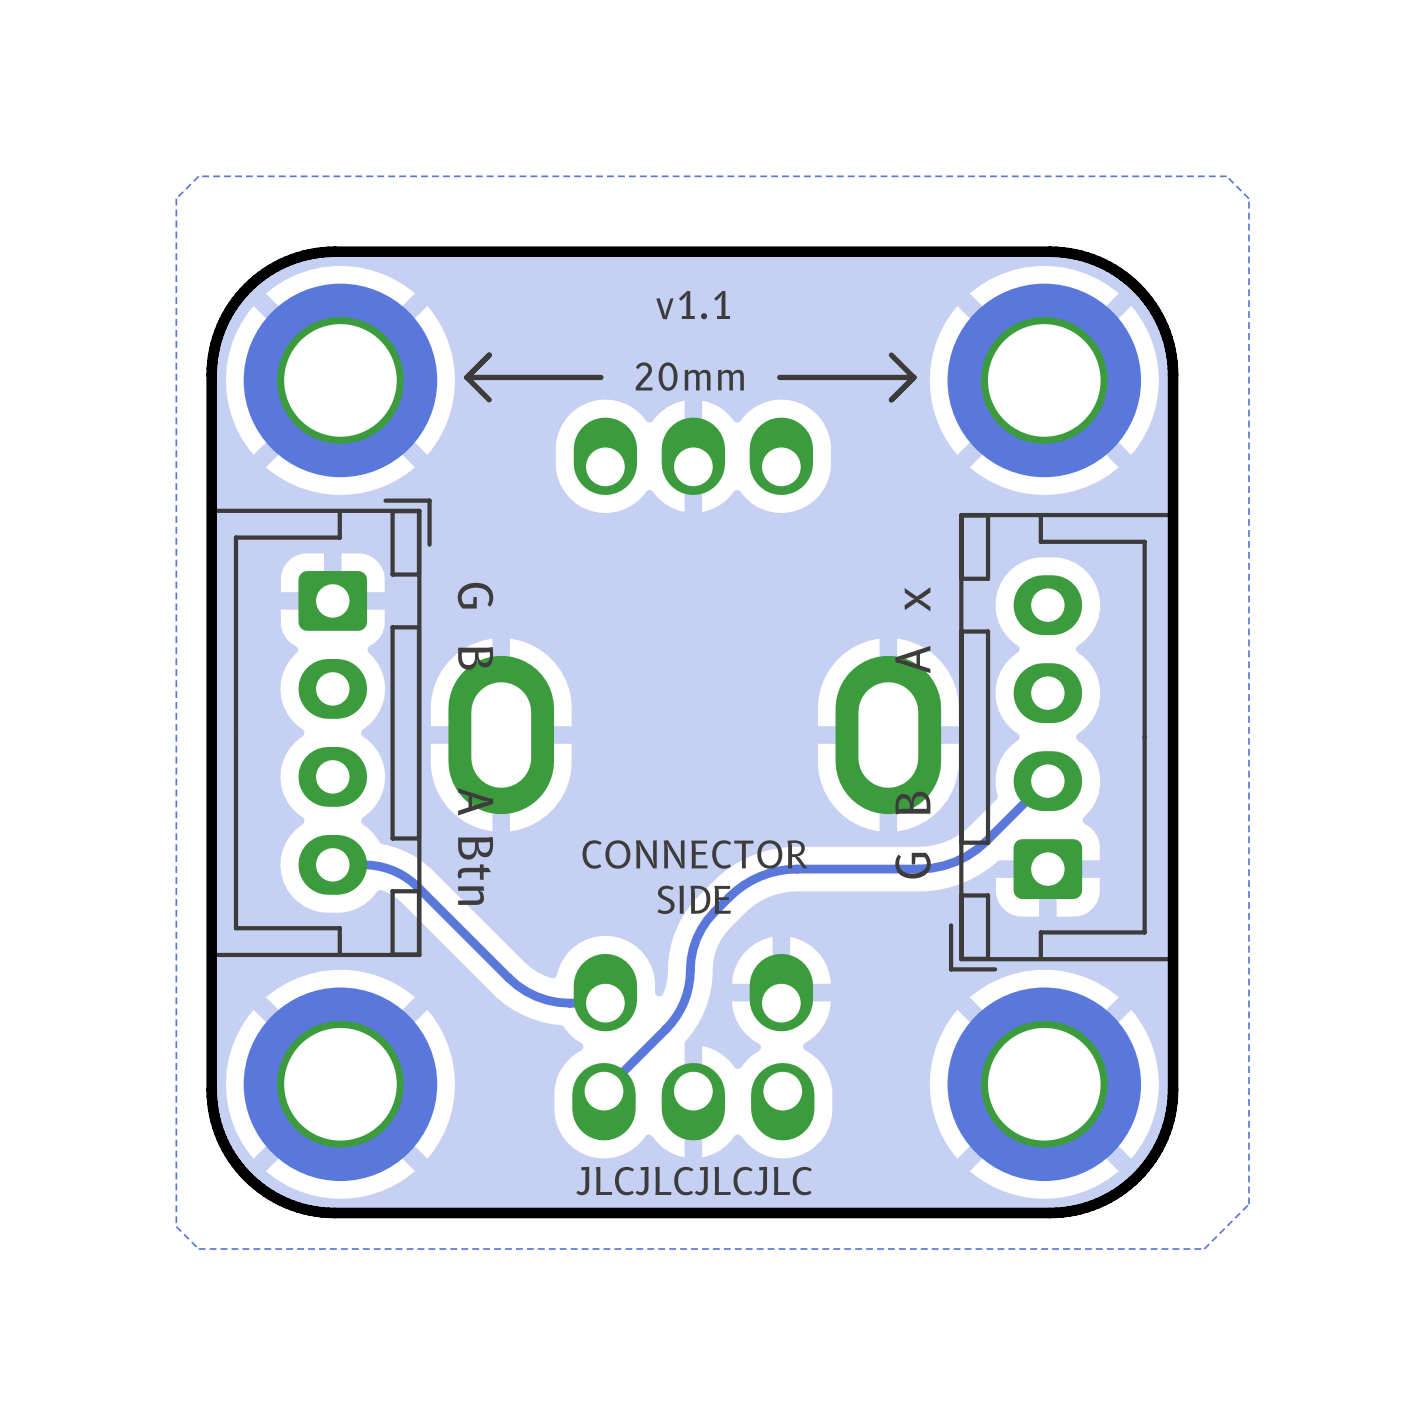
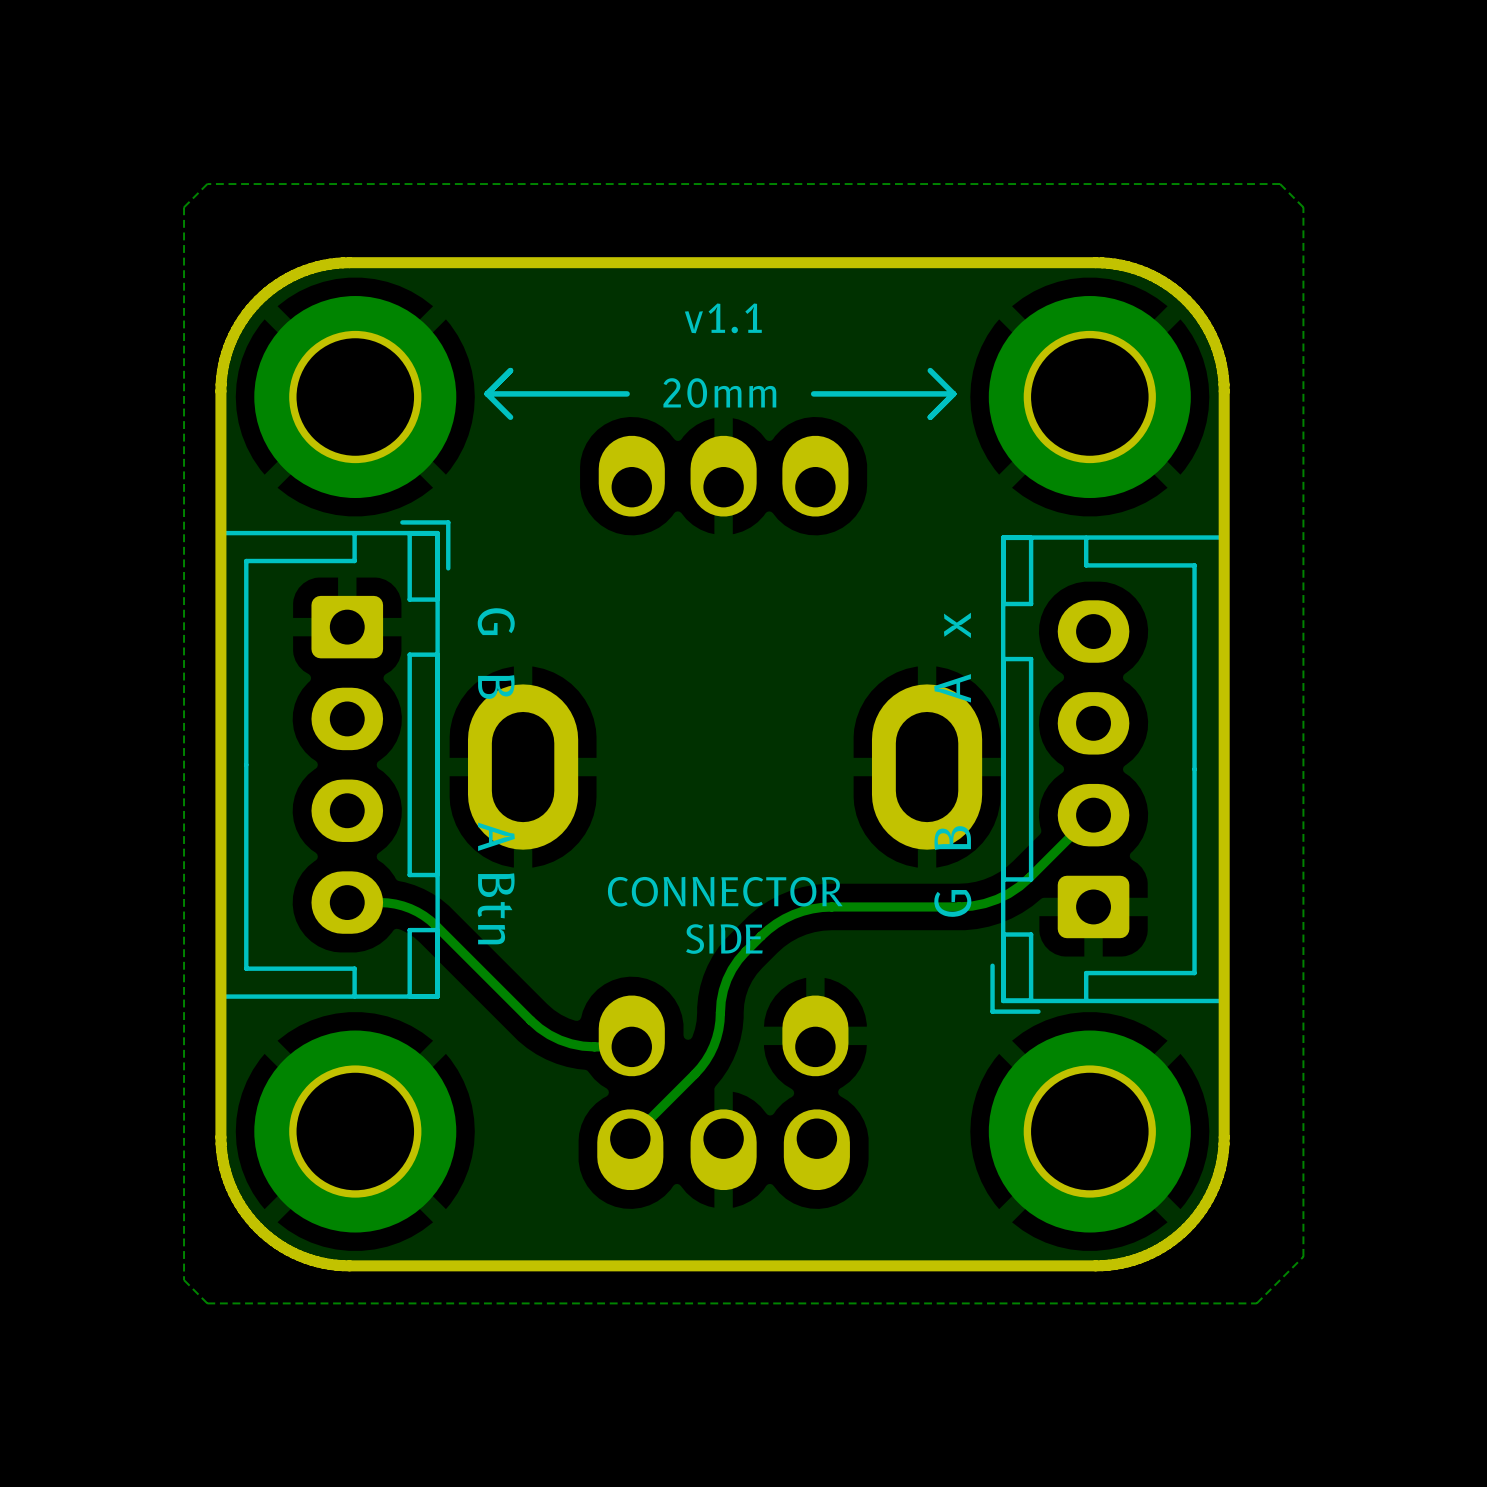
text: JLCJLCJLCJLC (694, 1181) -> none

